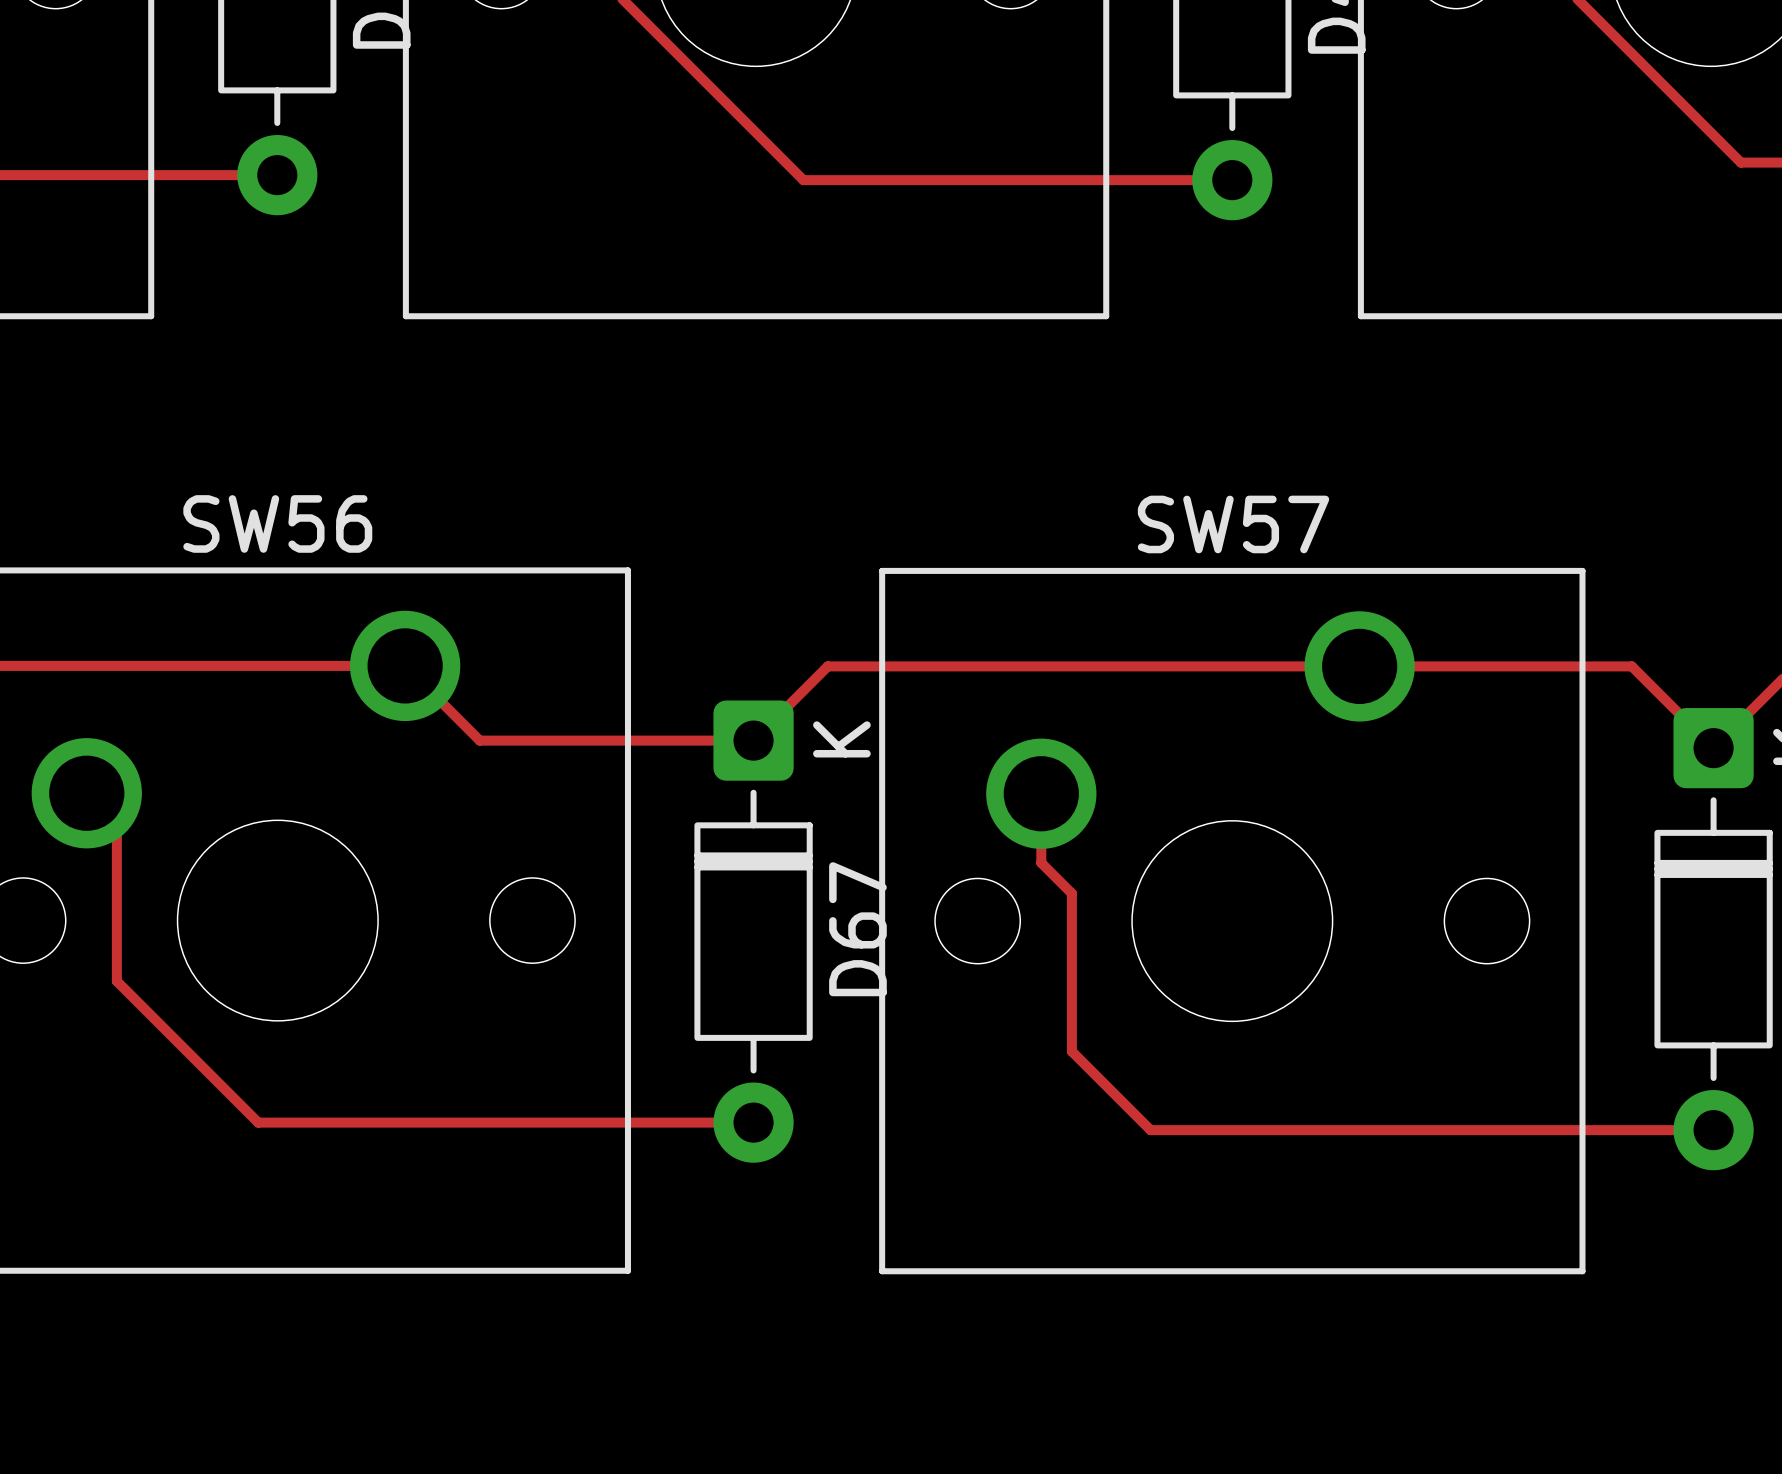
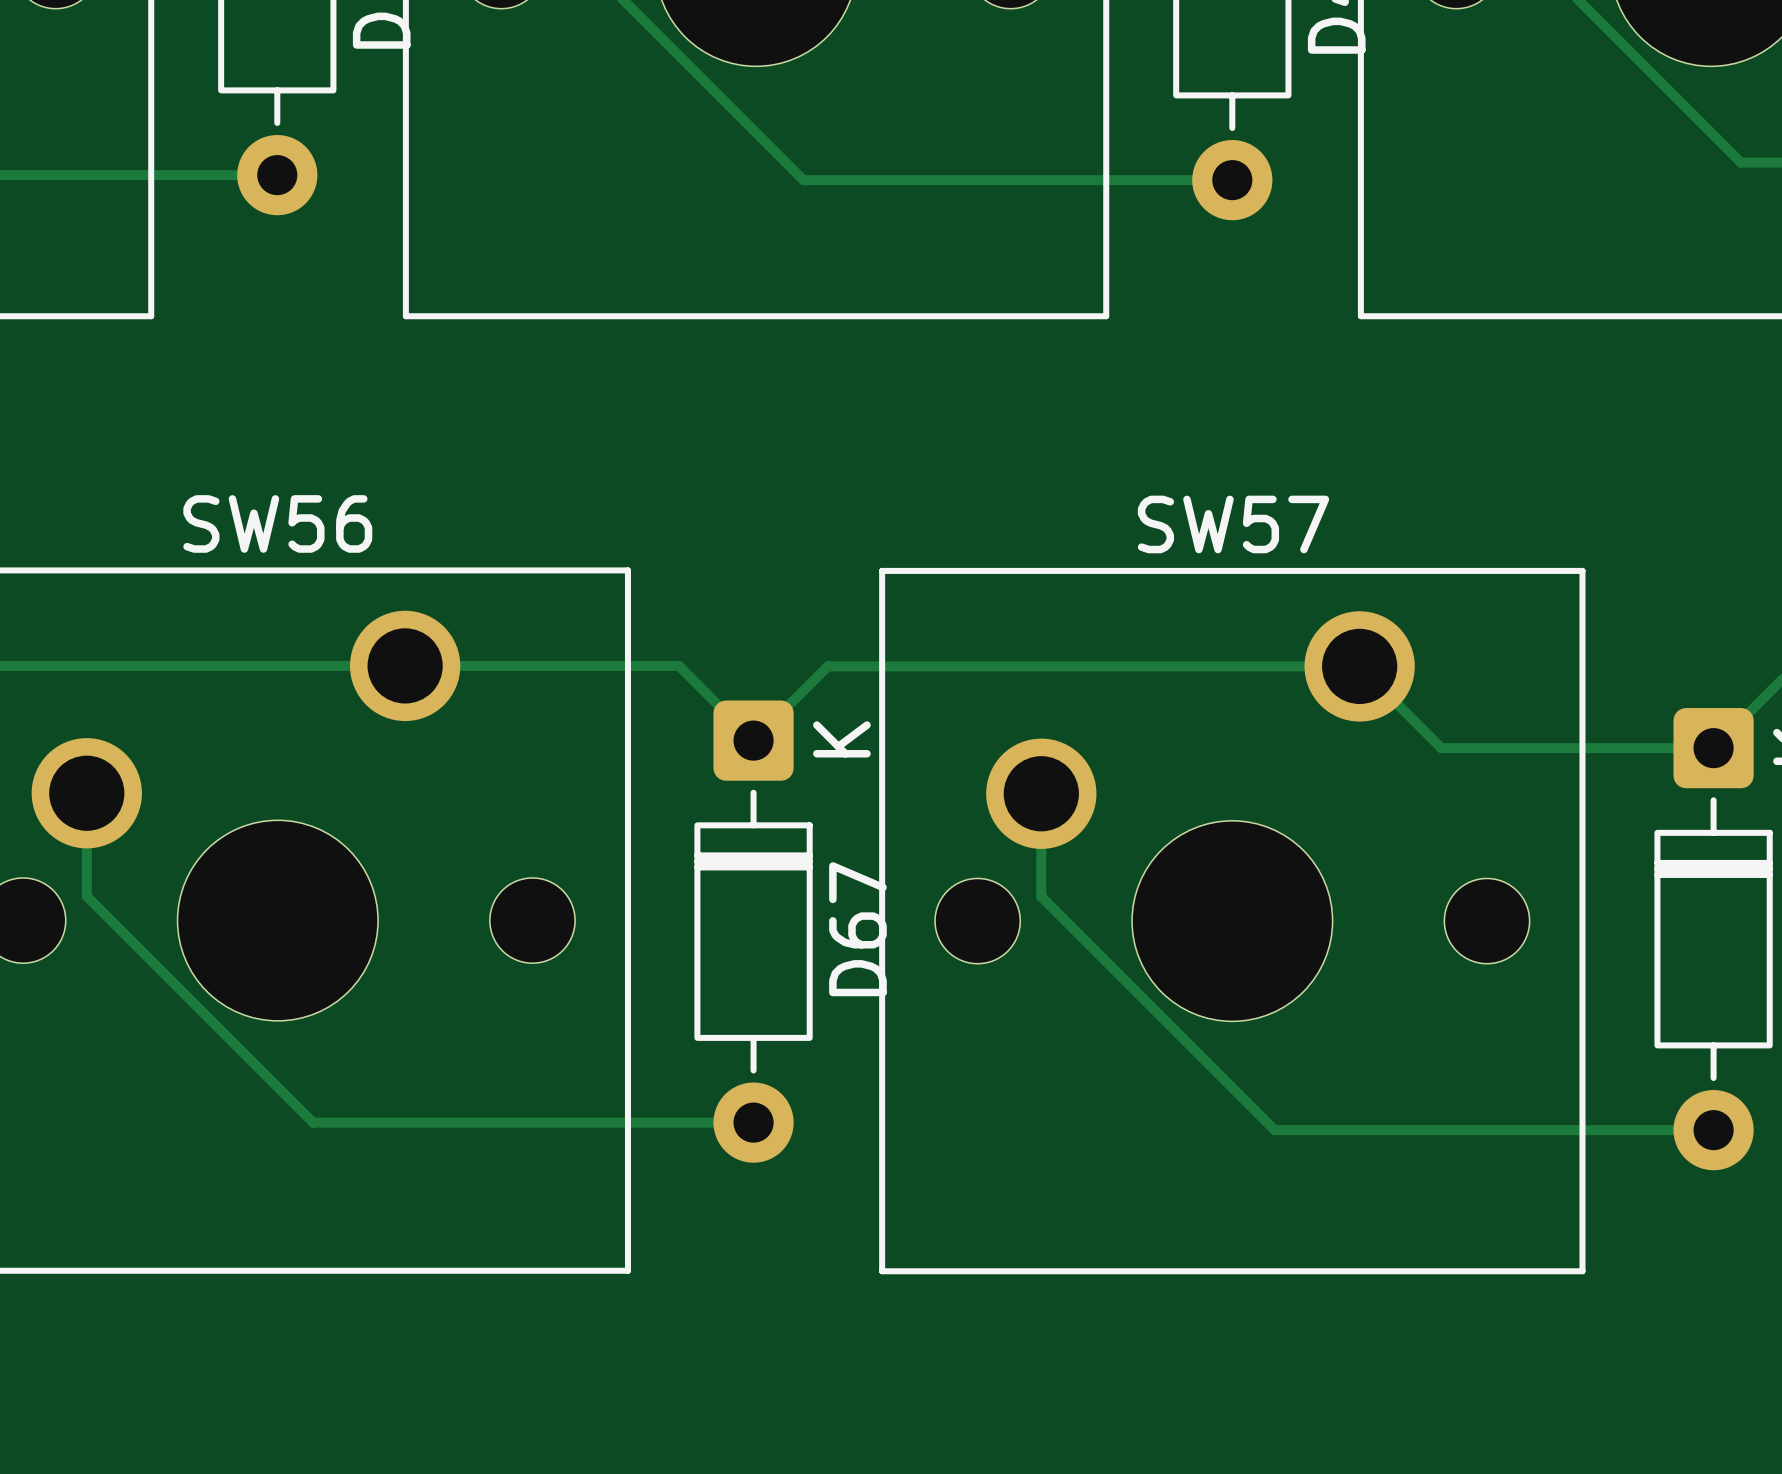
track: (405, 665) (479, 740) (753, 740) -> (405, 665) (678, 665) (753, 740)
track: (1359, 666) (1631, 666) (1713, 748) -> (1359, 666) (1441, 748) (1713, 748)
track: (86, 793) (116, 823) (116, 981) (258, 1122) (313, 1122) -> (86, 793) (86, 896) (313, 1122)
track: (1041, 862) (1071, 893) (1071, 1051) (1150, 1130) (1274, 1130) -> (1041, 862) (1041, 896) (1274, 1130)

